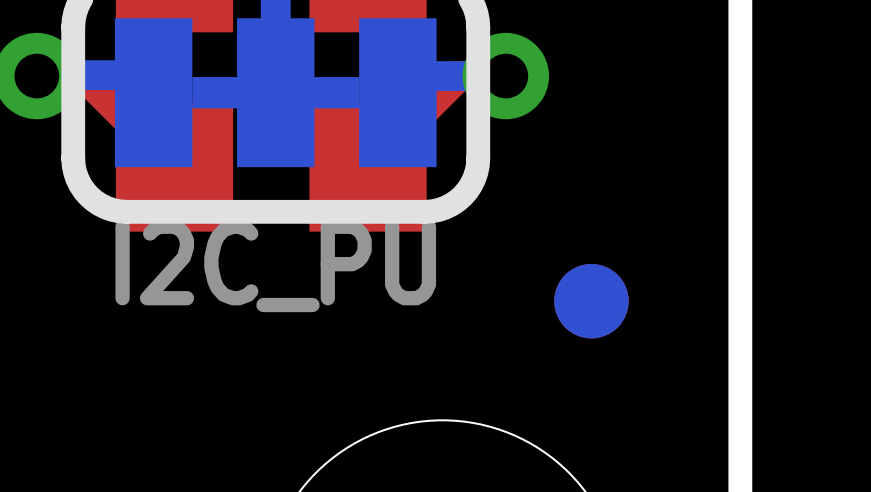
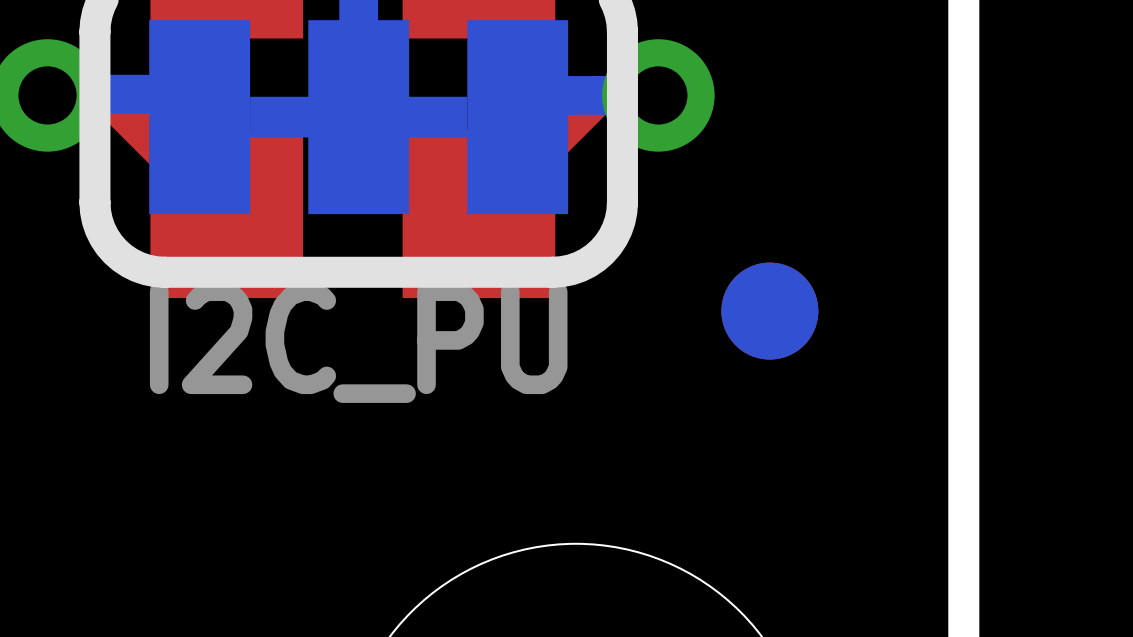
part position: (591, 301) -> (769, 311)

